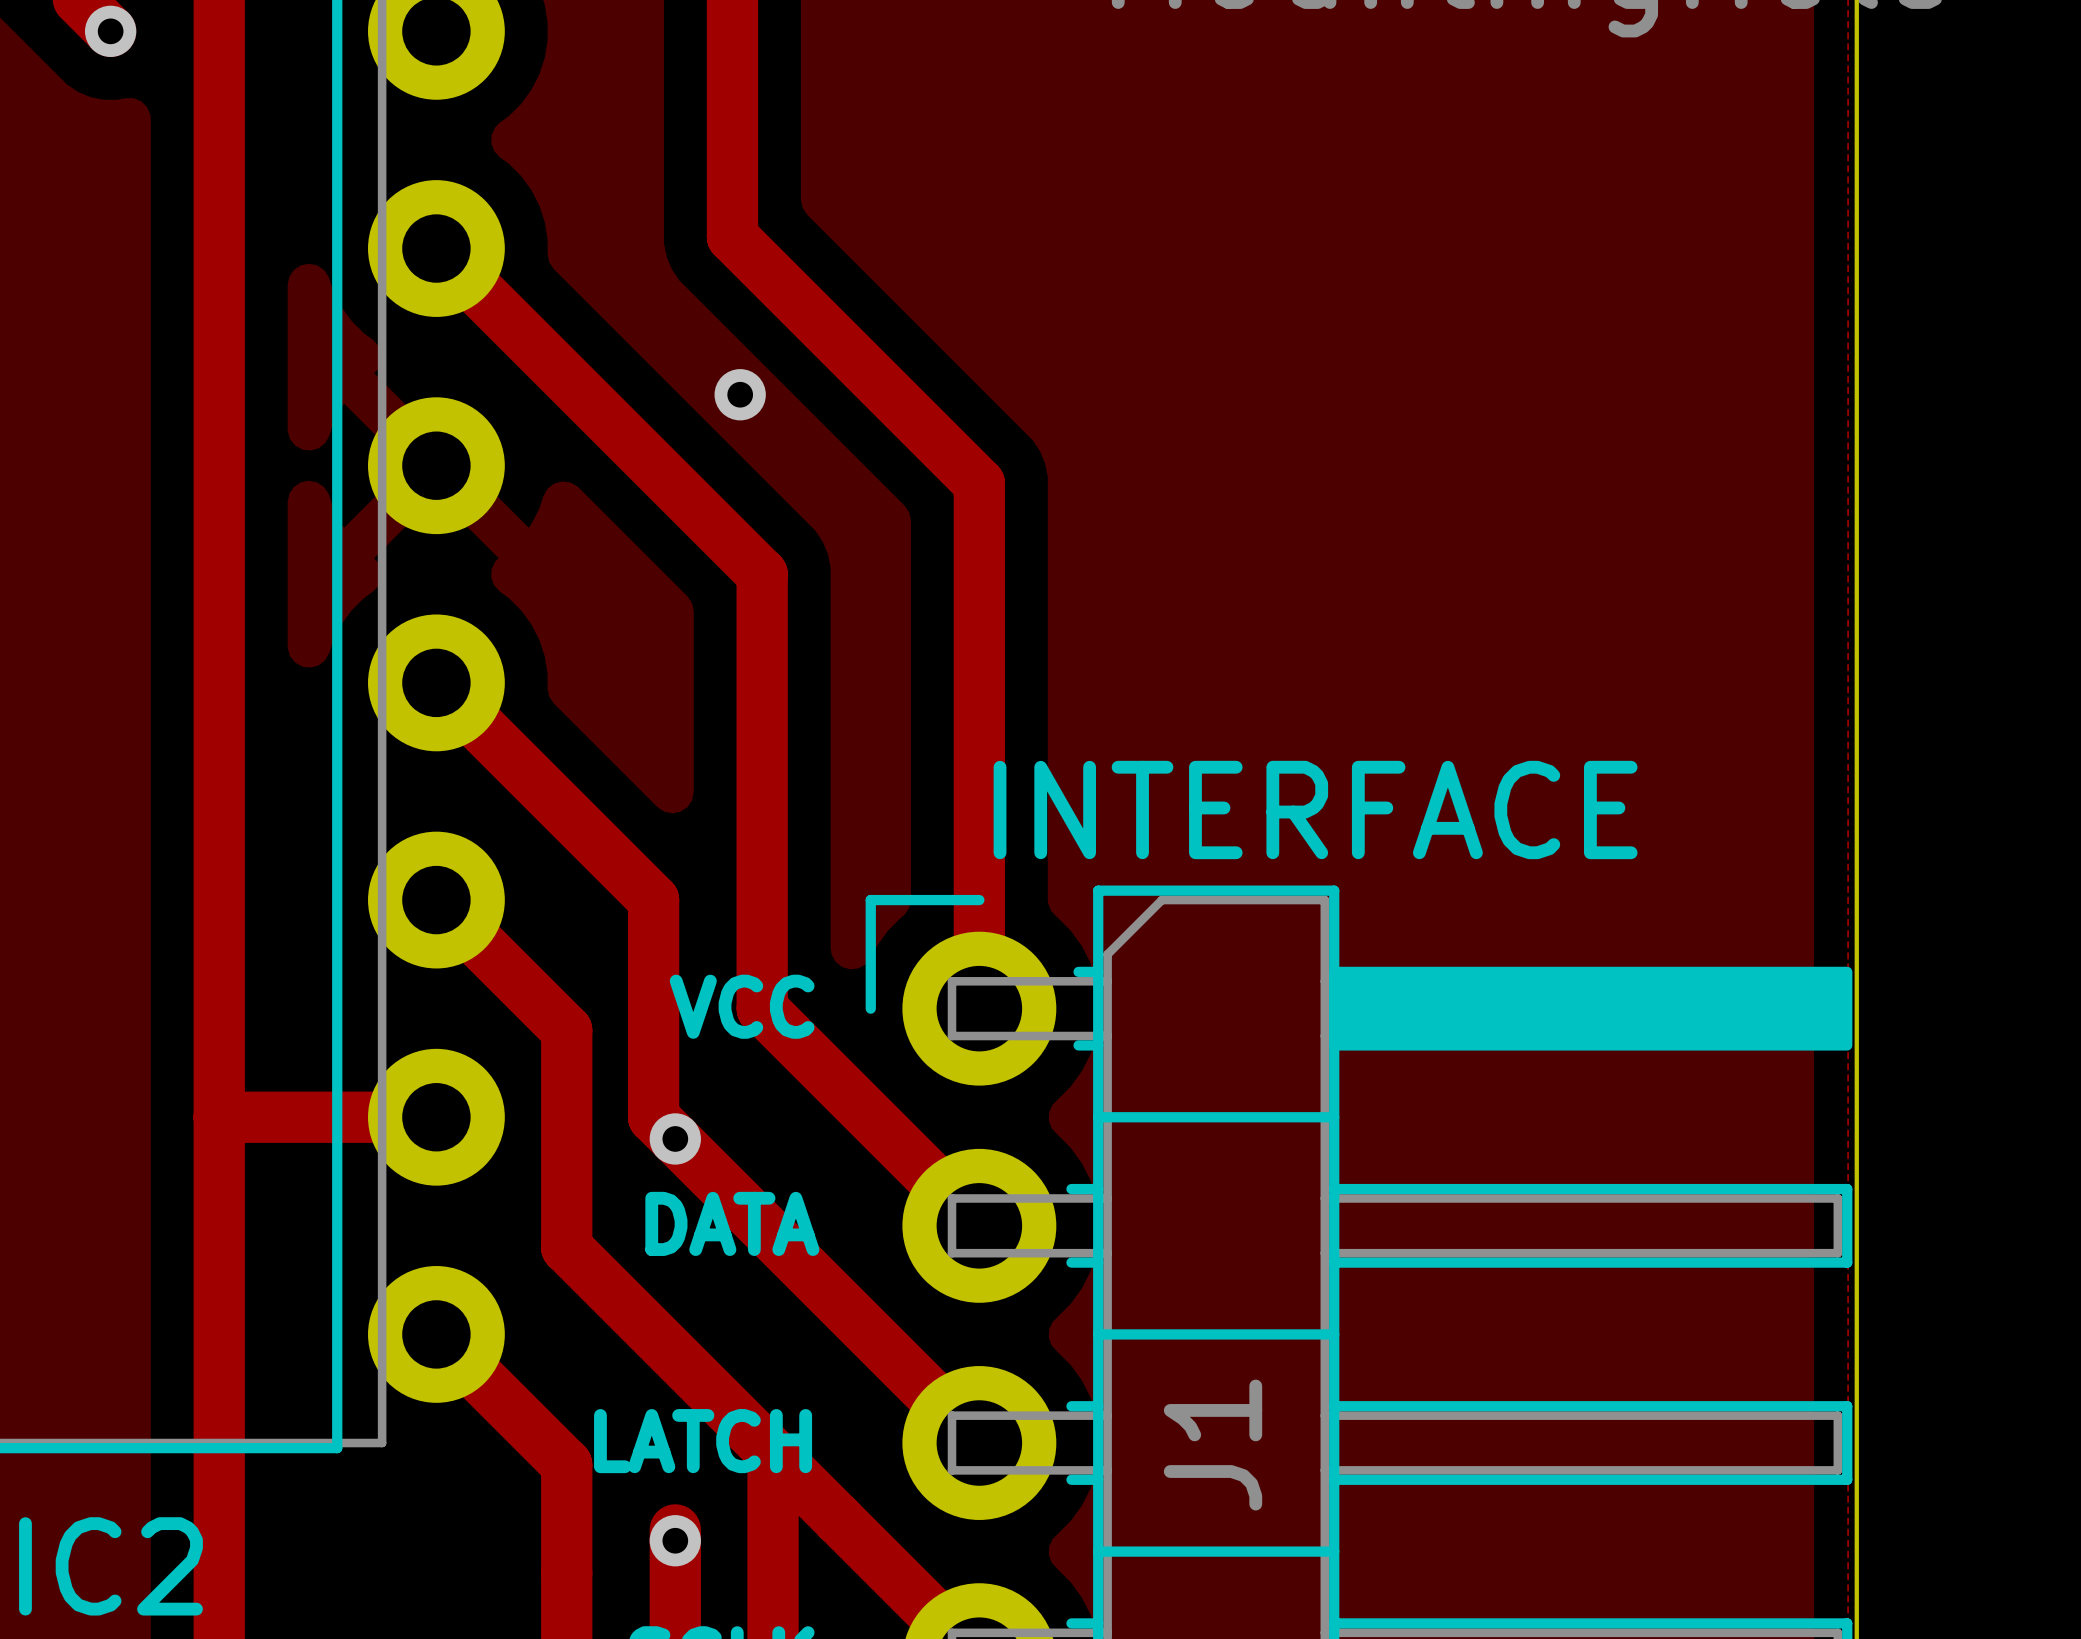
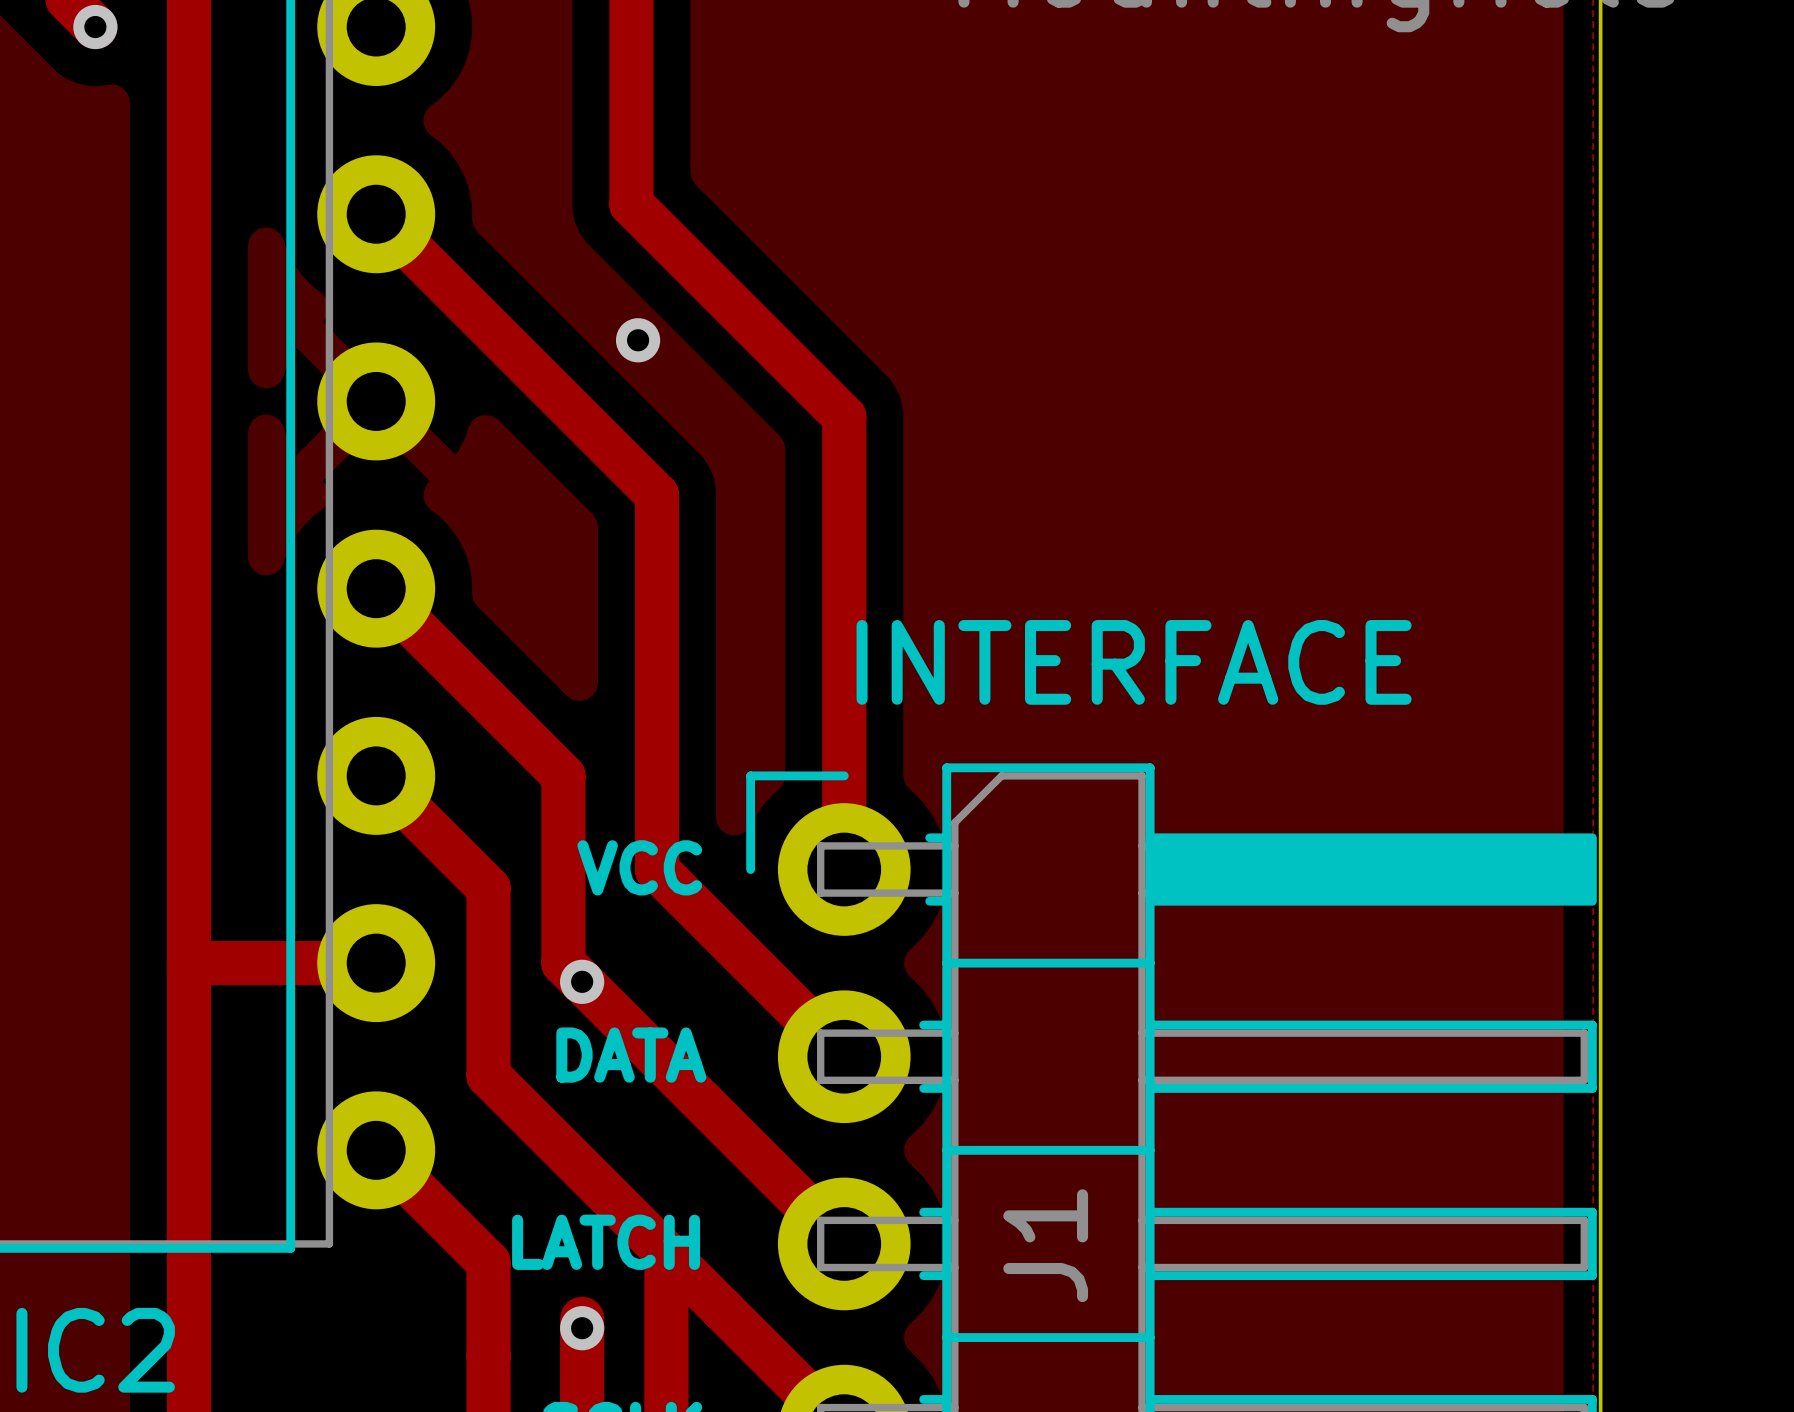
J1 value position: INTERFACE (1315, 810) -> INTERFACE (1134, 662)

